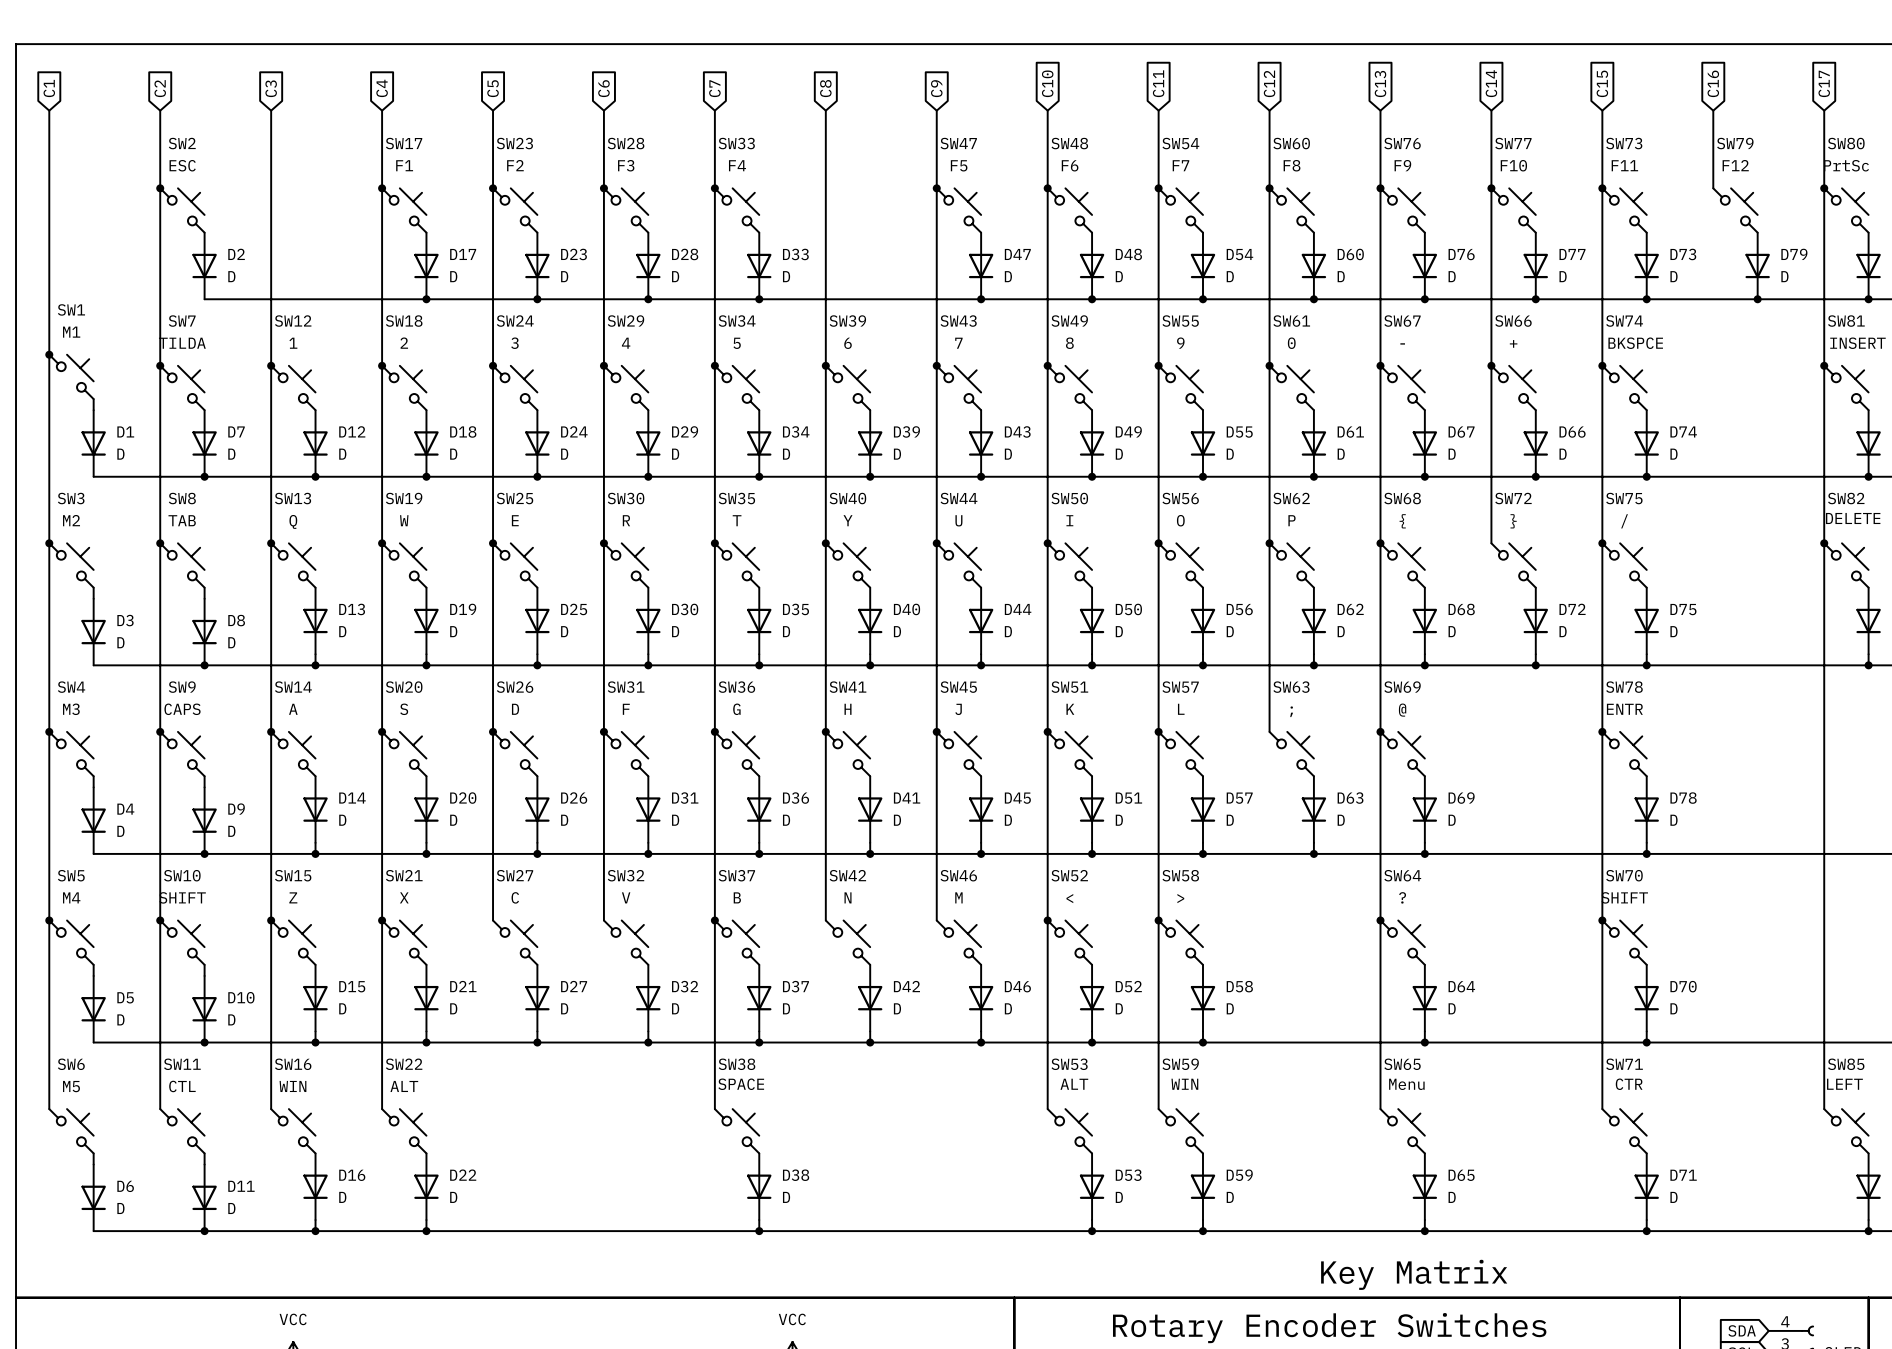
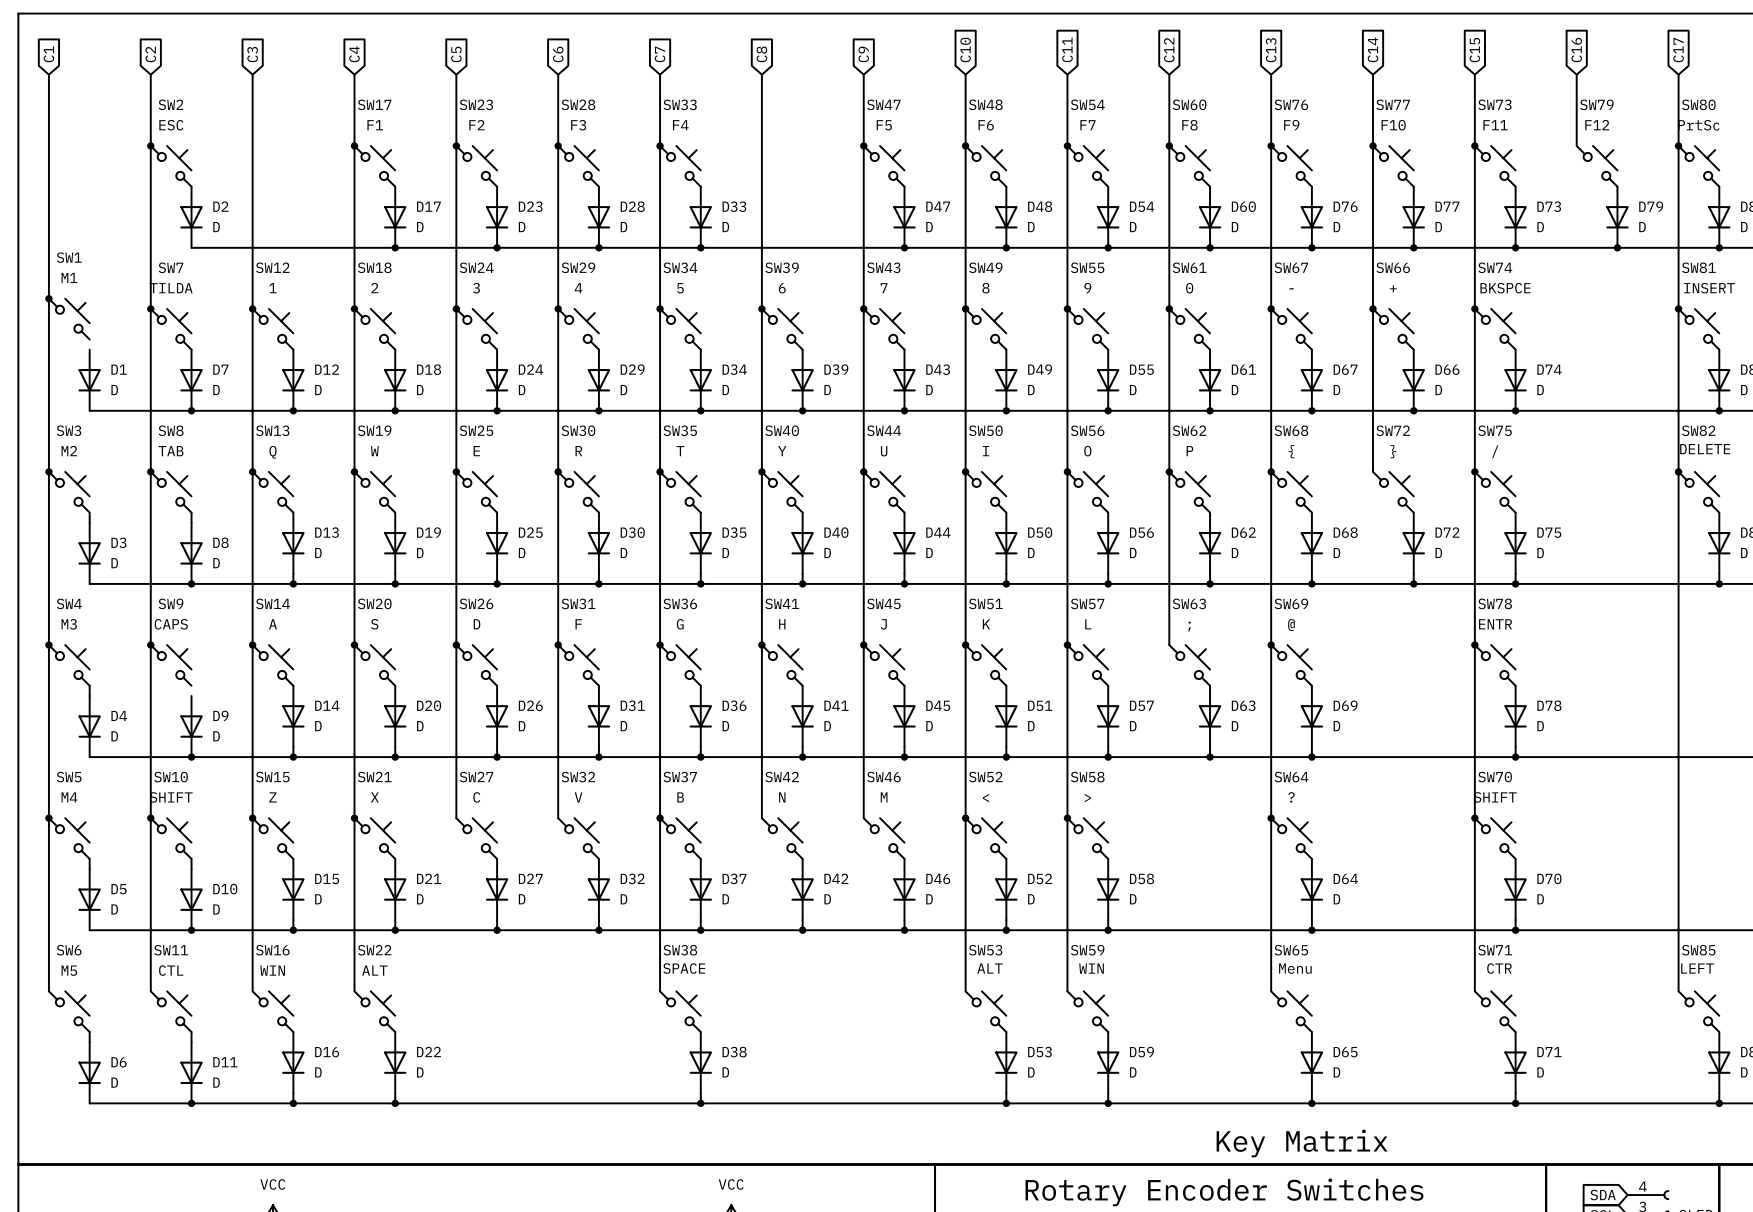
wire: (93, 399) (93, 410) -> none
wire: (204, 776) (204, 787) -> none

